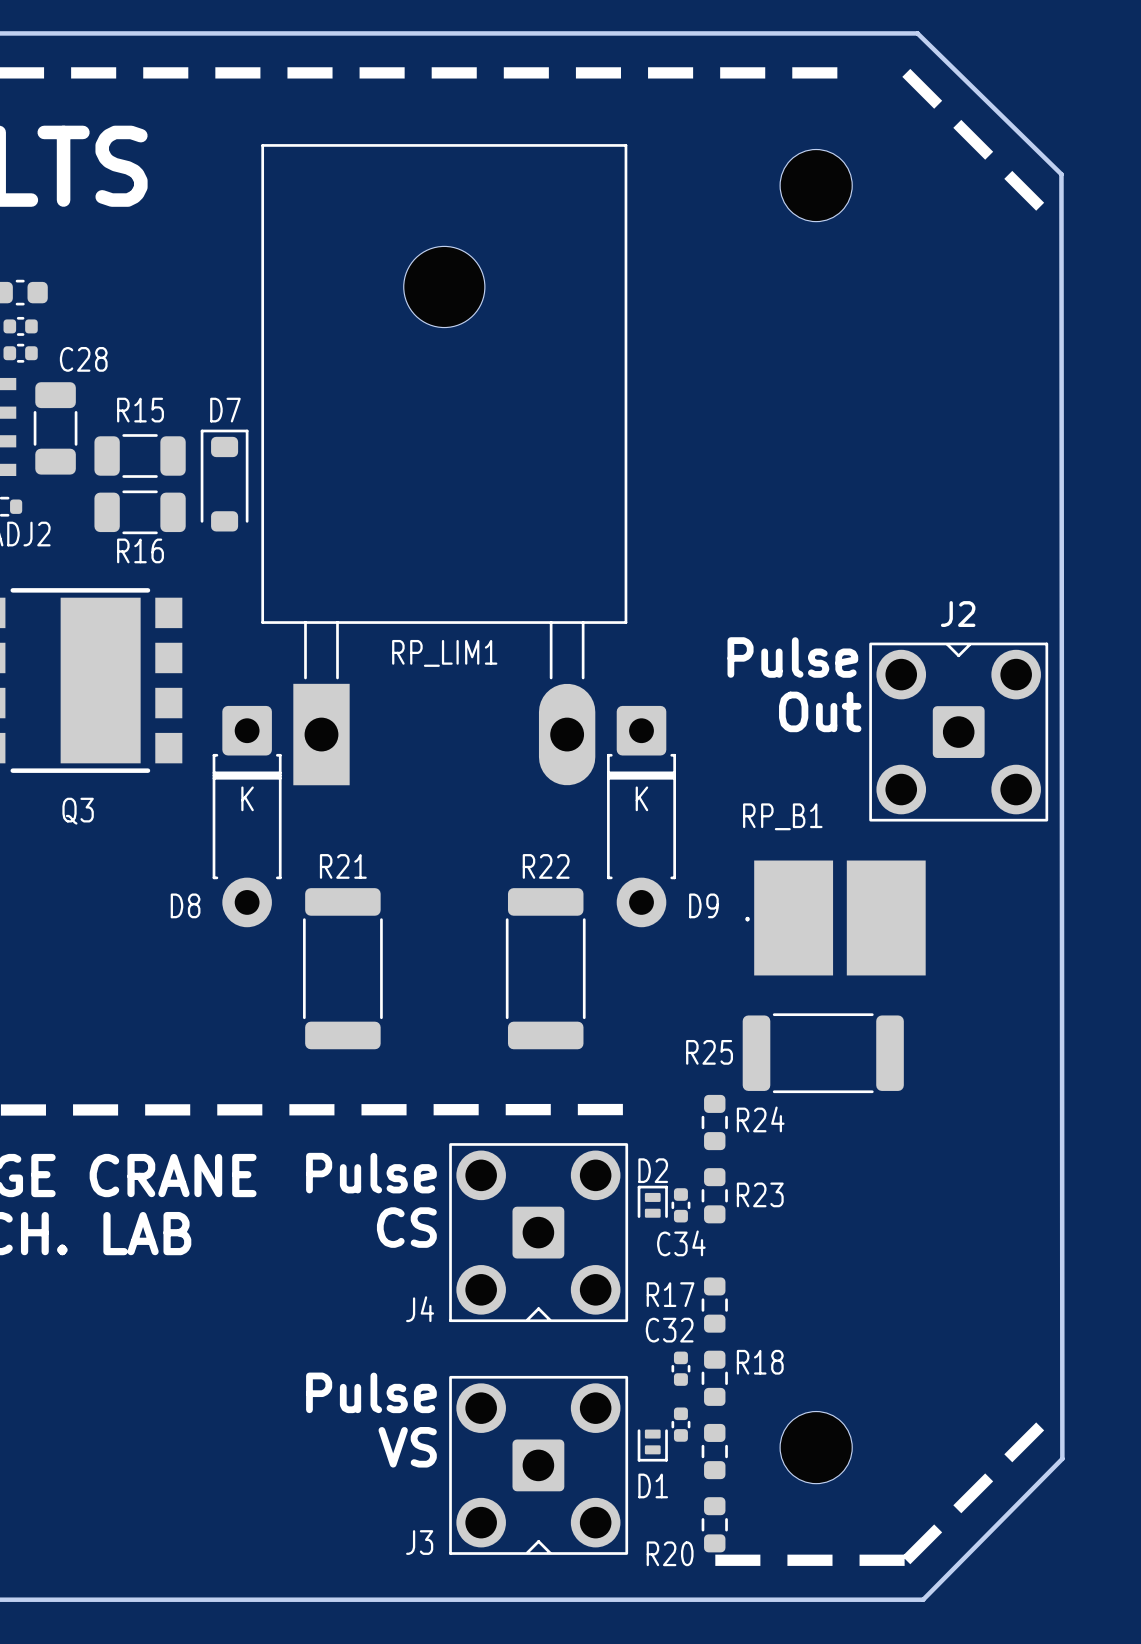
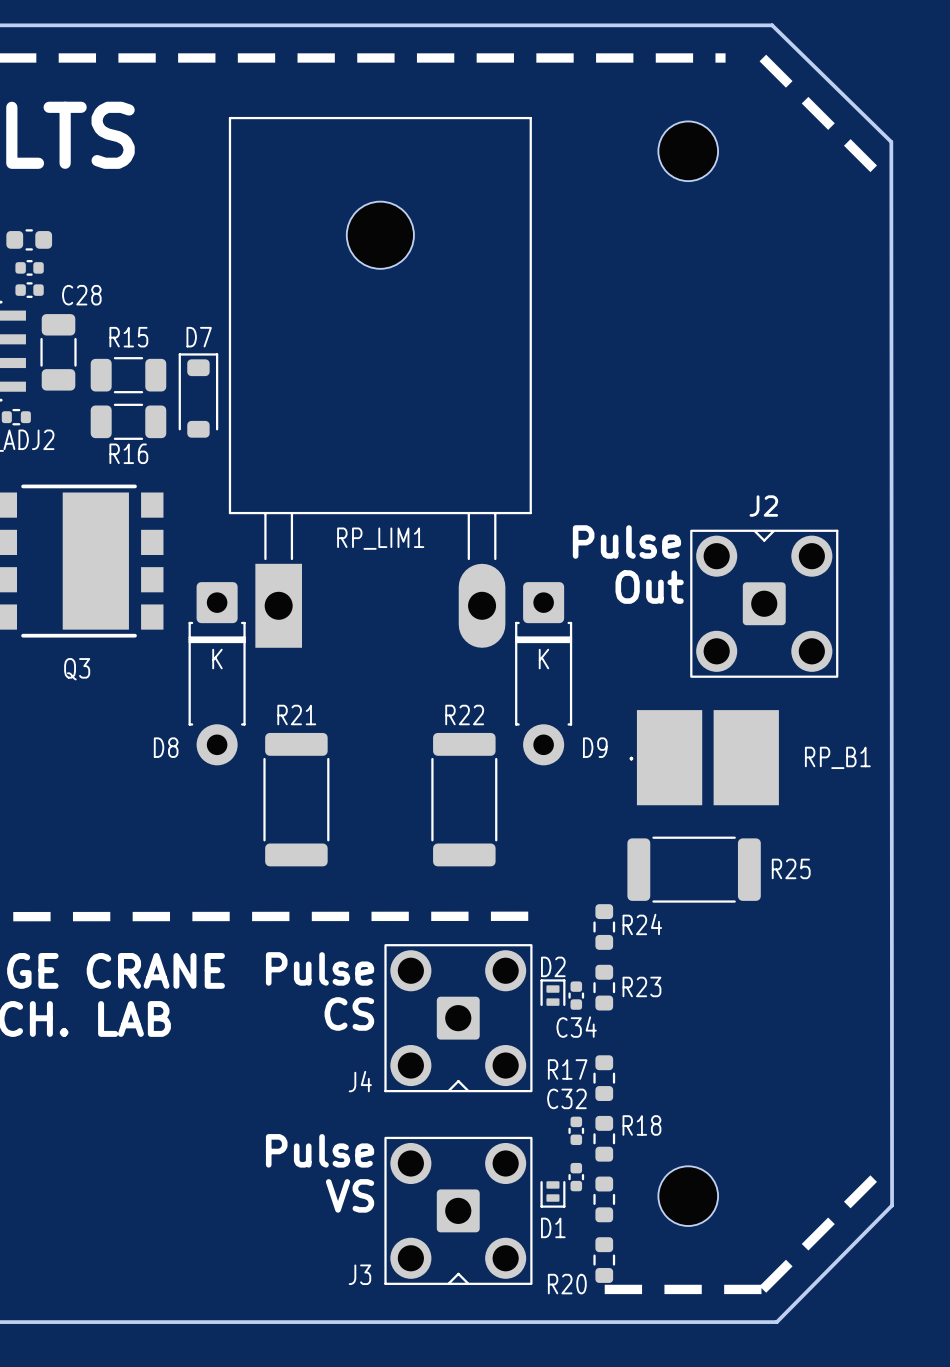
text position: Pulse (792, 657) -> Pulse (626, 542)
text position: Out (820, 711) -> Out (649, 587)
J2 position: (958, 732) -> (764, 603)
RP_B1 name position: RP_B1 (782, 816) -> RP_B1 (837, 757)
R25 name position: R25 (709, 1052) -> R25 (791, 868)

